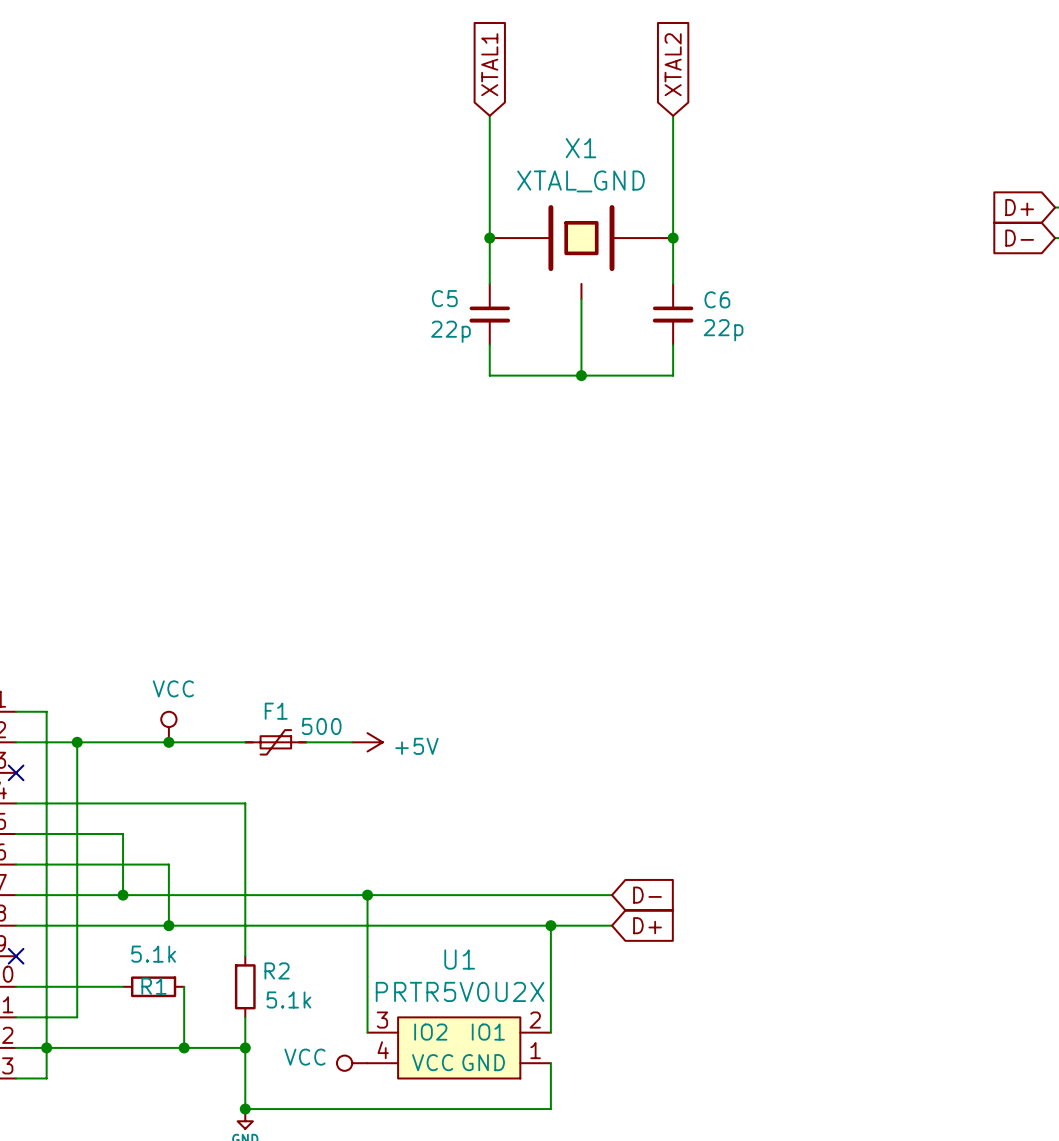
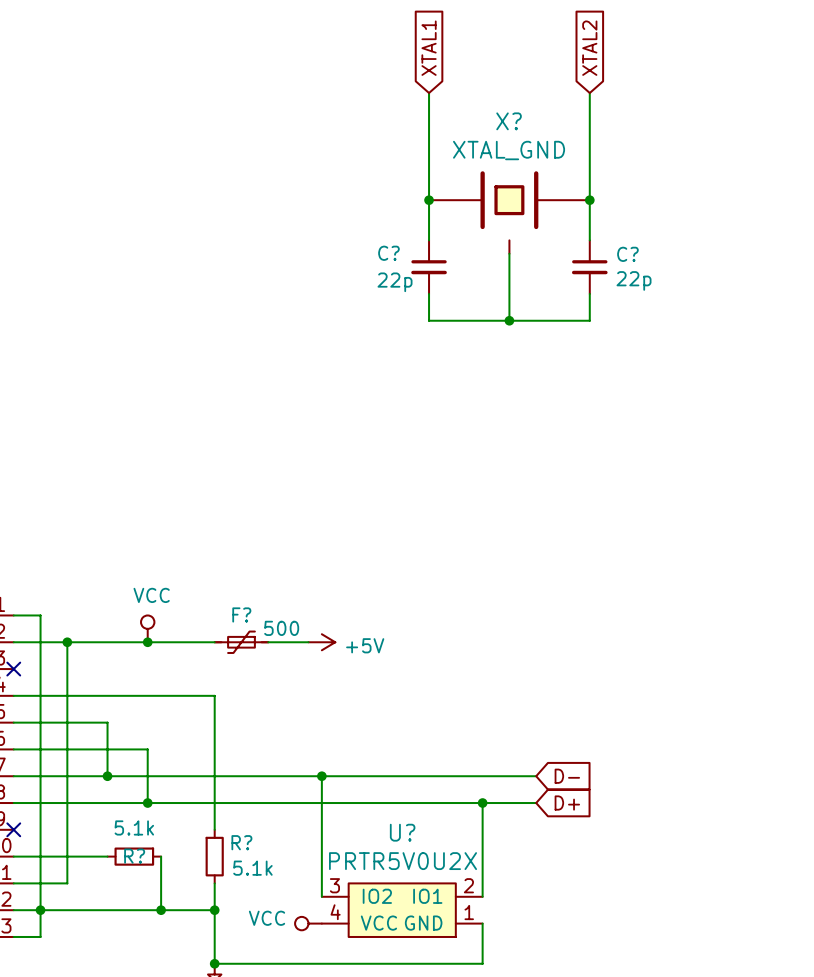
X1 name: X1 (581, 148) -> X? (509, 121)
C5 name: C5 (444, 298) -> C? (388, 253)
C6 name: C6 (717, 299) -> C? (627, 254)
F1 name: F1 (276, 711) -> F? (241, 614)
U1 name: U1 (459, 959) -> U? (402, 832)
R2 name: R2 (277, 970) -> R? (241, 842)
R1 name: R1 (153, 986) -> R? (134, 856)

